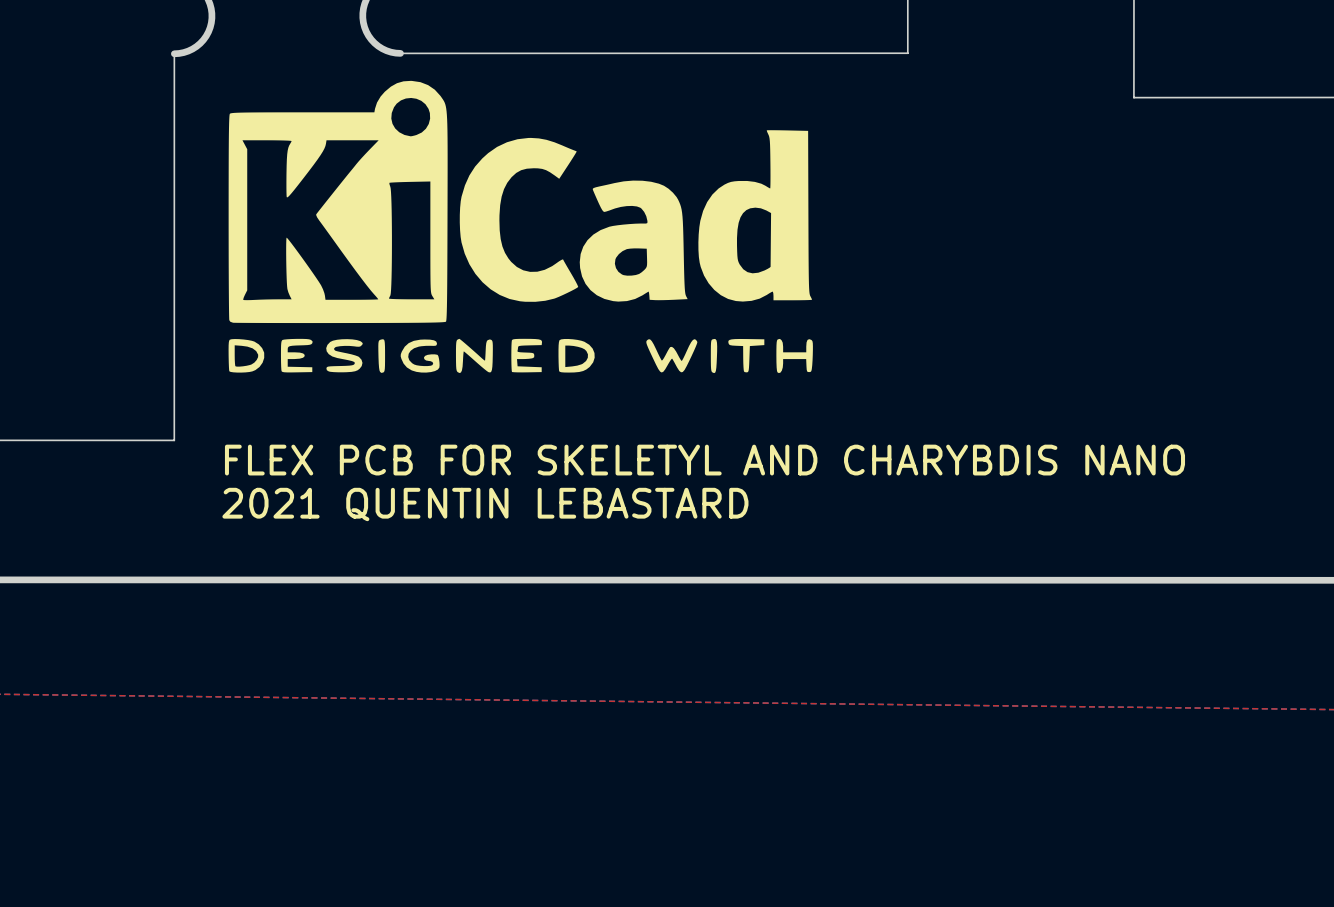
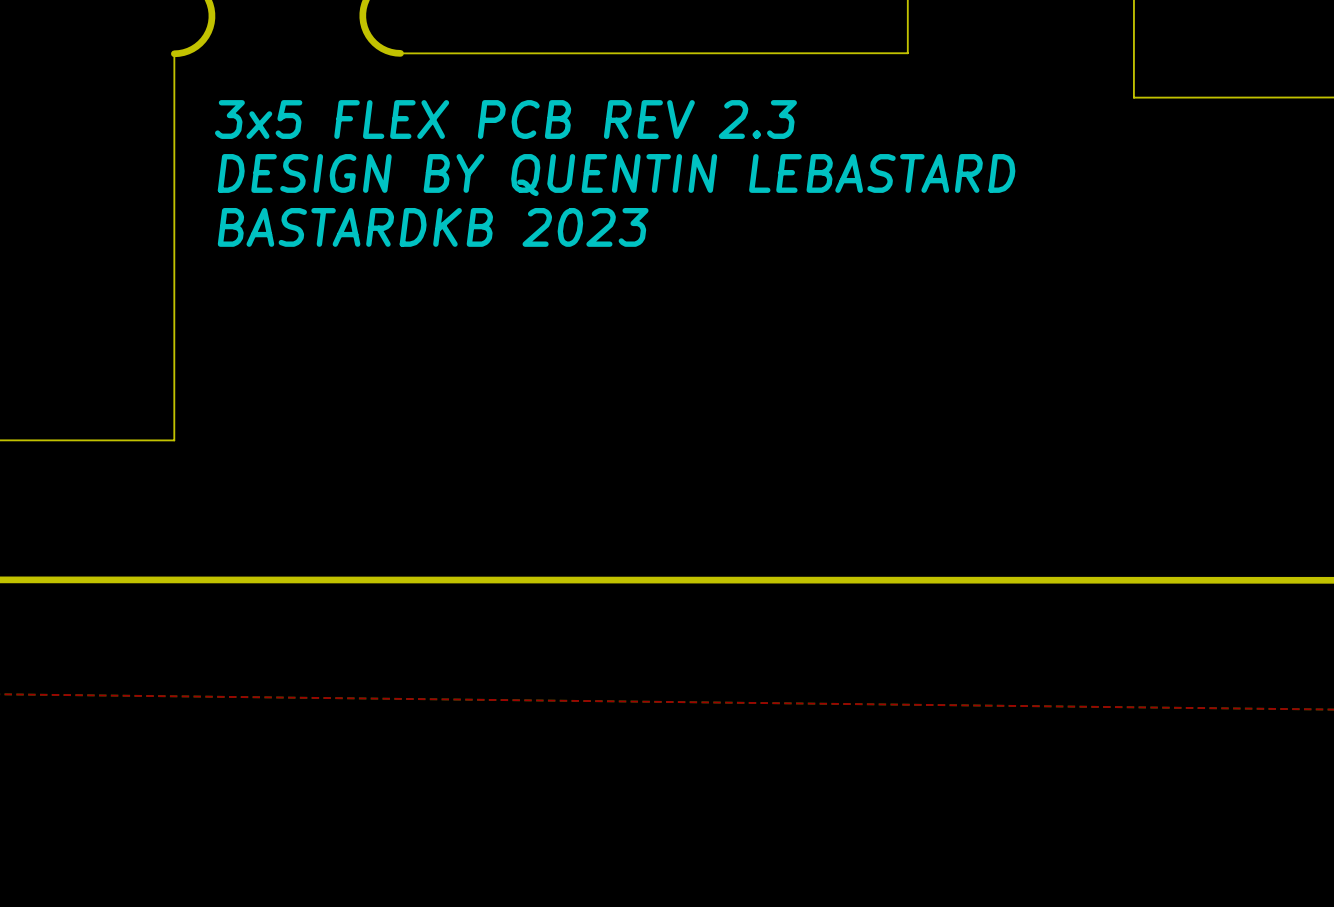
drawing: [228, 80, 813, 374] -> none
text: none -> 3x5 FLEX PCB REV 2.3 (505, 119)
text: none -> DESIGN BY QUENTIN LEBASTARD (616, 175)
text: none -> BASTARDKB 2023 (433, 227)
text: FLEX PCB FOR SKELETYL AND CHARYBDIS NANO (704, 460) -> none
text: 2021 QUENTIN LEBASTARD (485, 504) -> none

